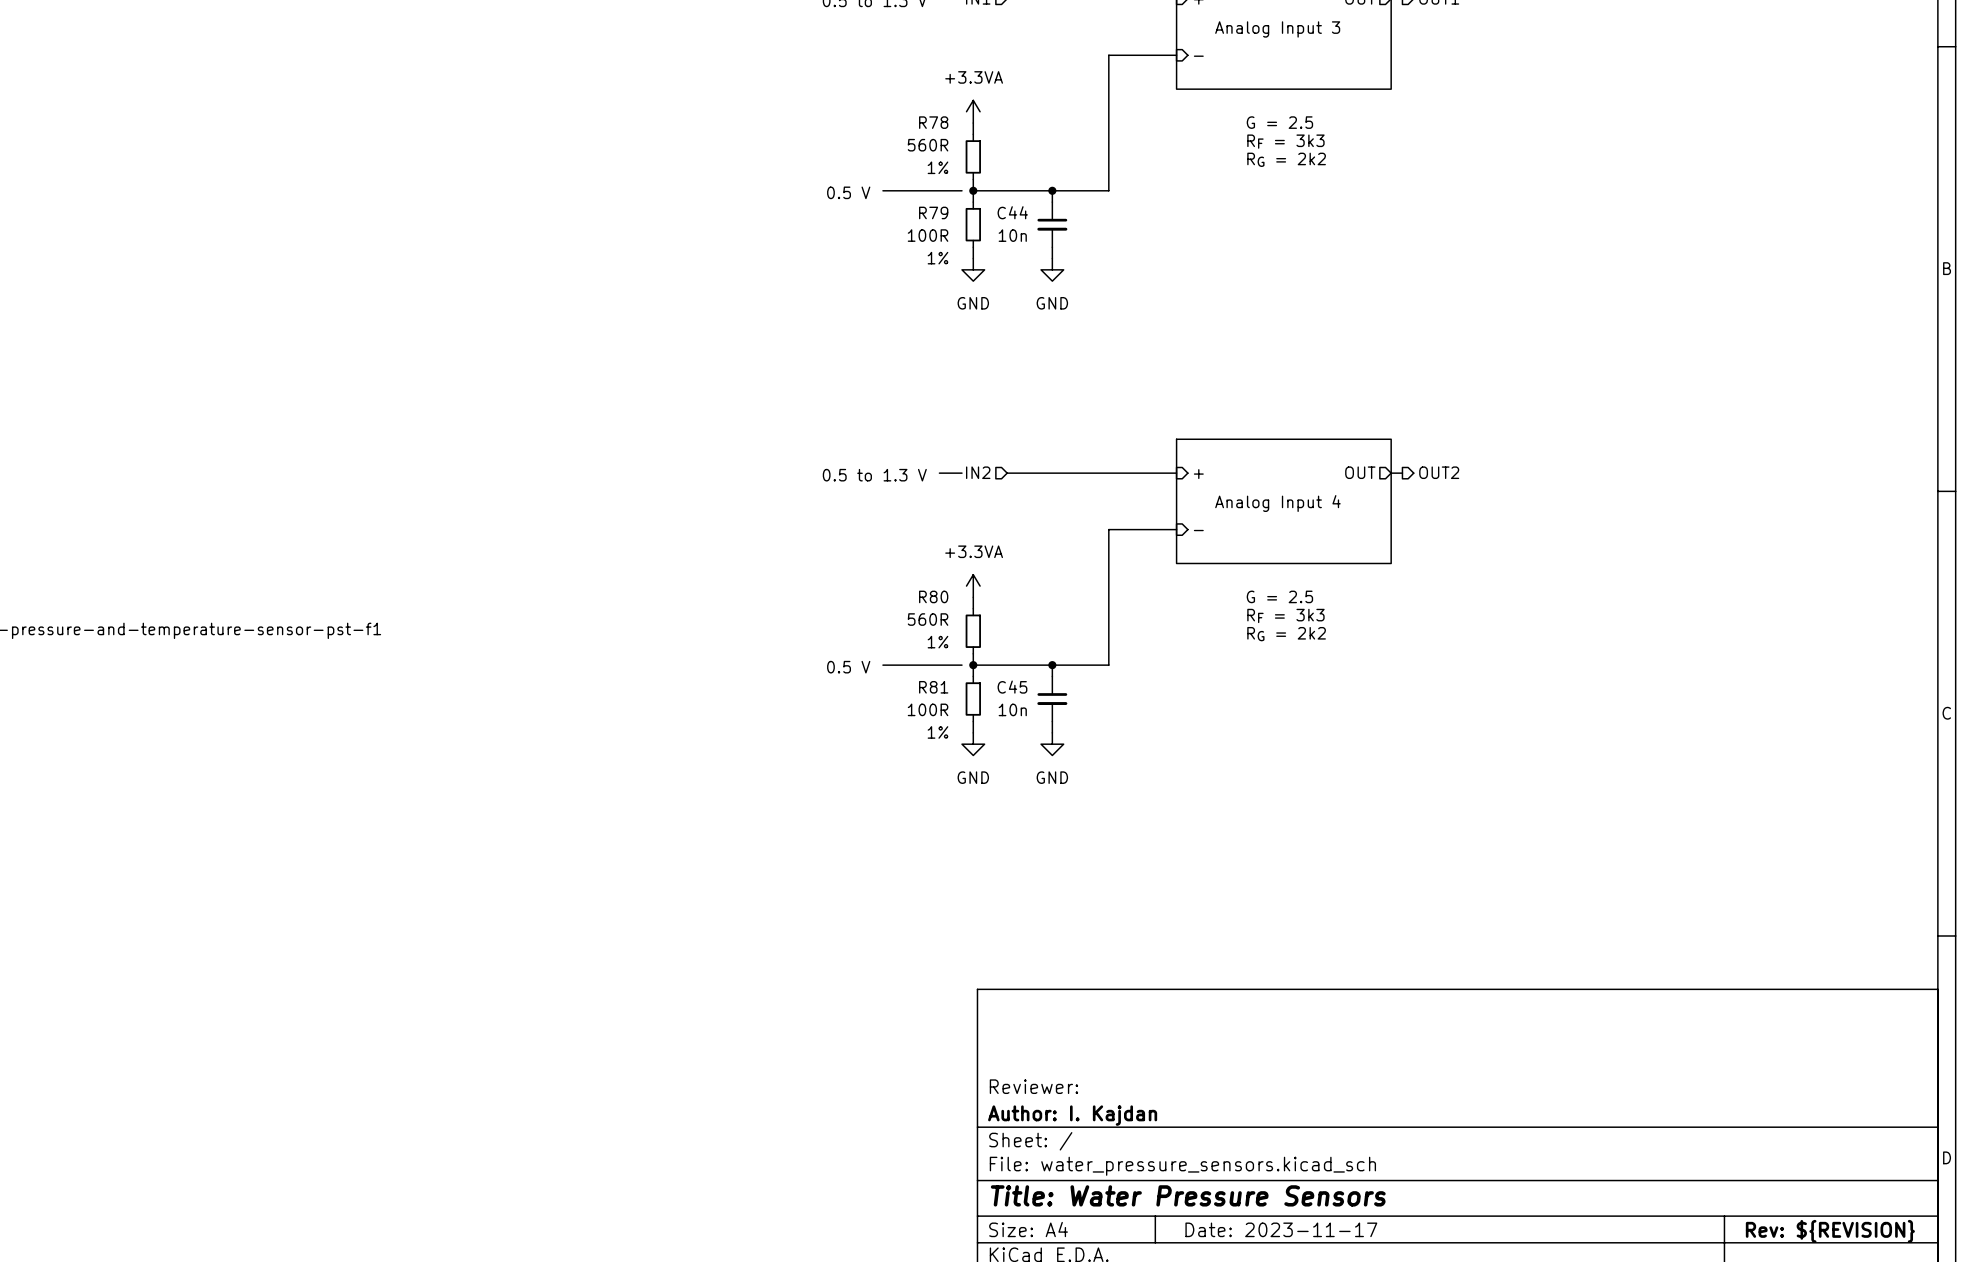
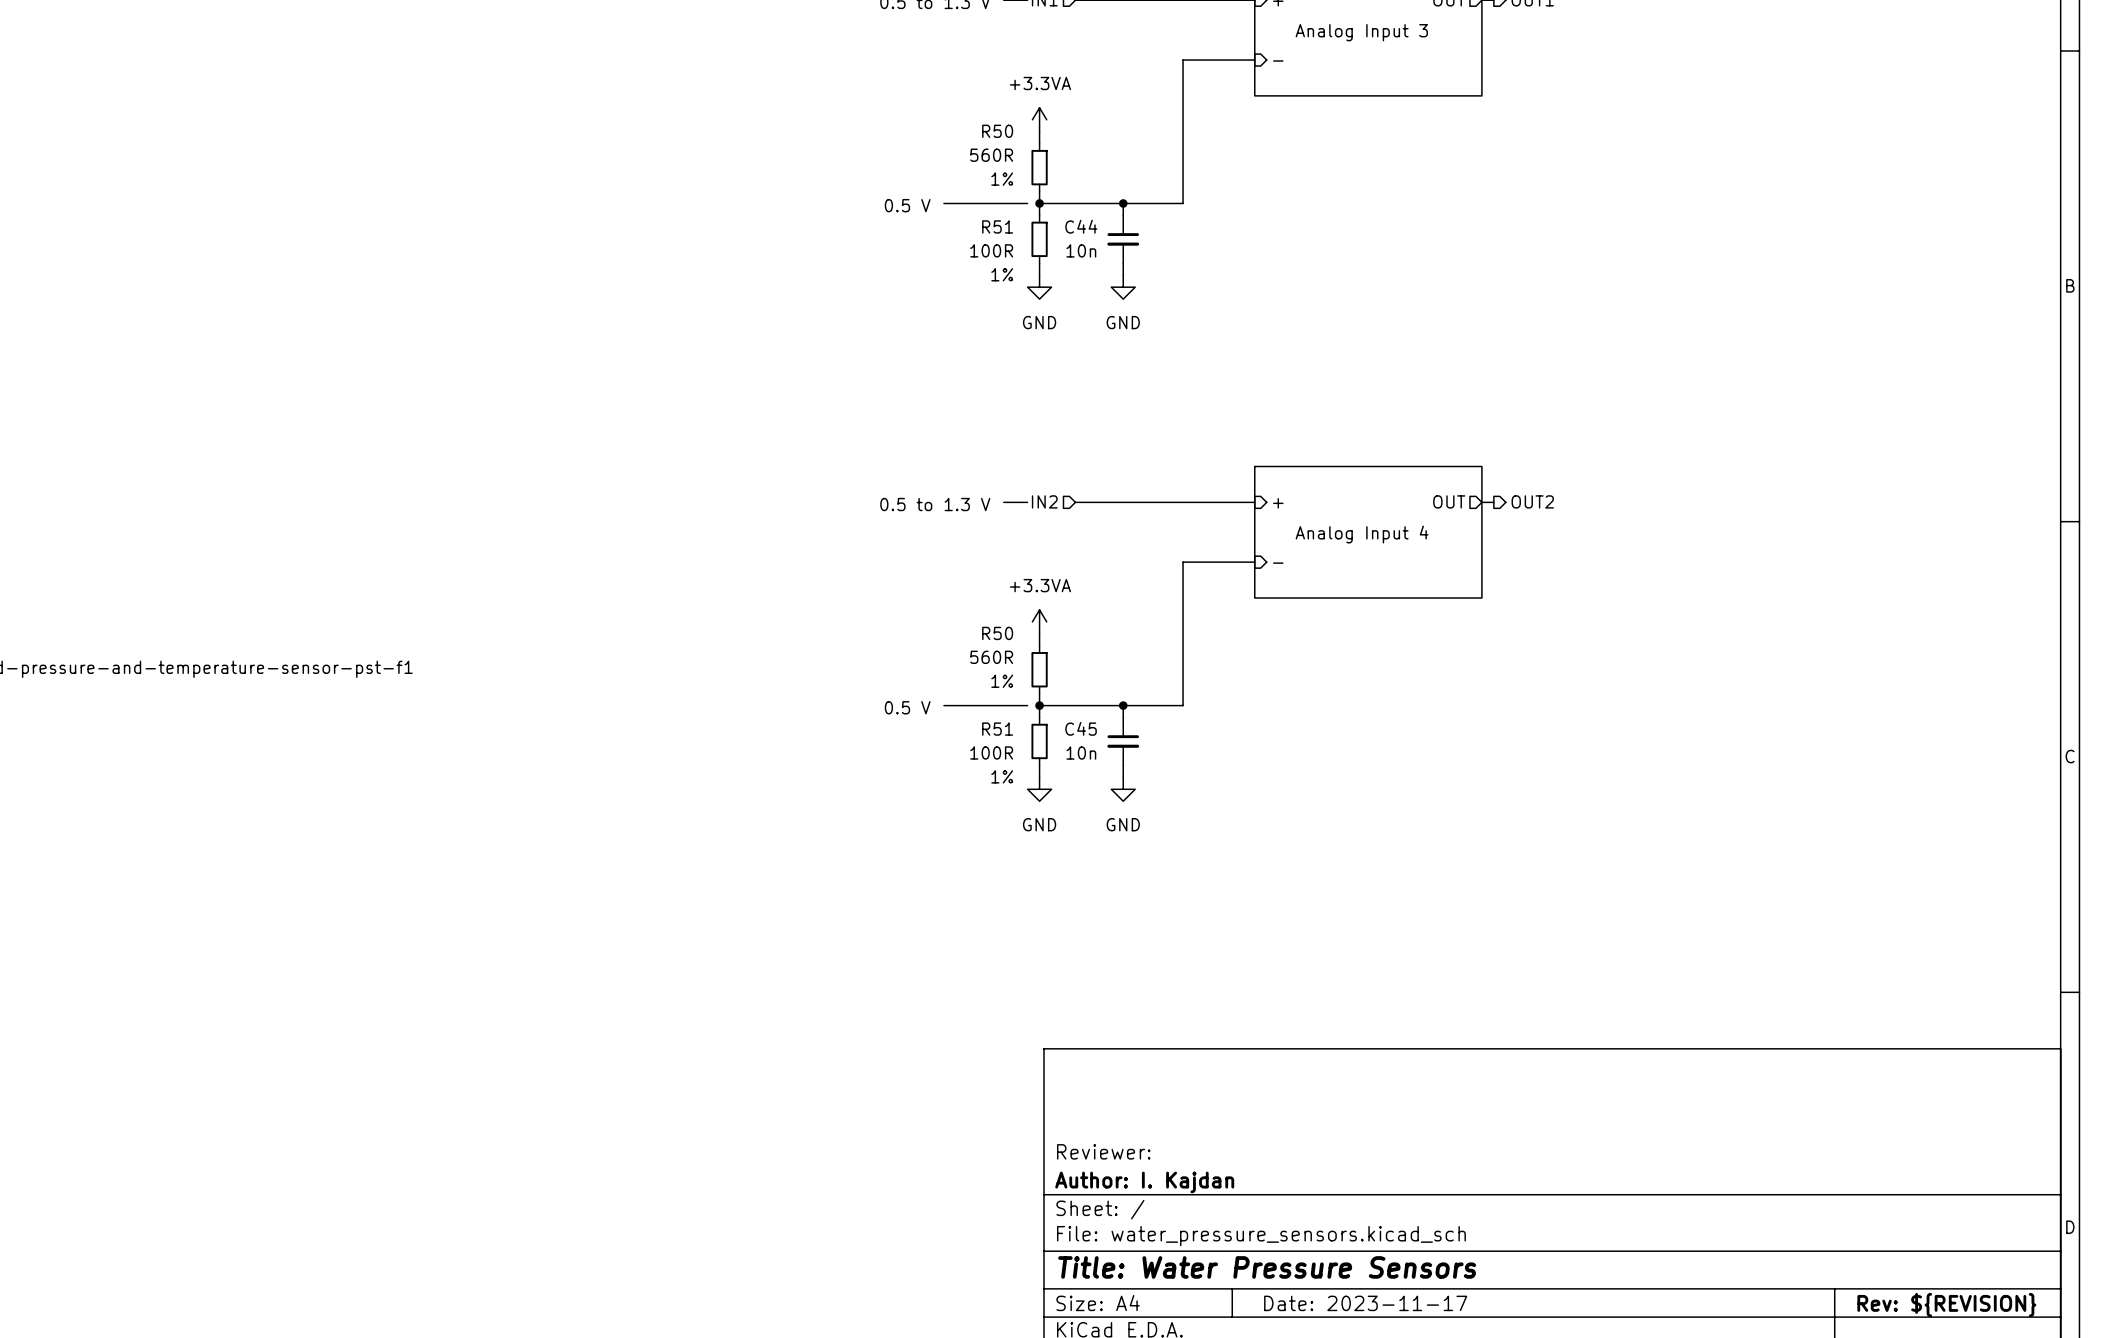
R78 name: R78 (933, 122) -> R50 (997, 131)
text: G = 2.5 (1279, 122) -> none
text: RF = 3k3 (1285, 141) -> none
text: RG = 2k2 (1286, 159) -> none
R79 name: R79 (933, 212) -> R51 (997, 226)
R80 name: R80 (933, 596) -> R50 (997, 633)
text: G = 2.5 (1279, 596) -> none
text: RF = 3k3 (1285, 615) -> none
text: RG = 2k2 (1286, 634) -> none
R81 name: R81 (933, 687) -> R51 (997, 729)

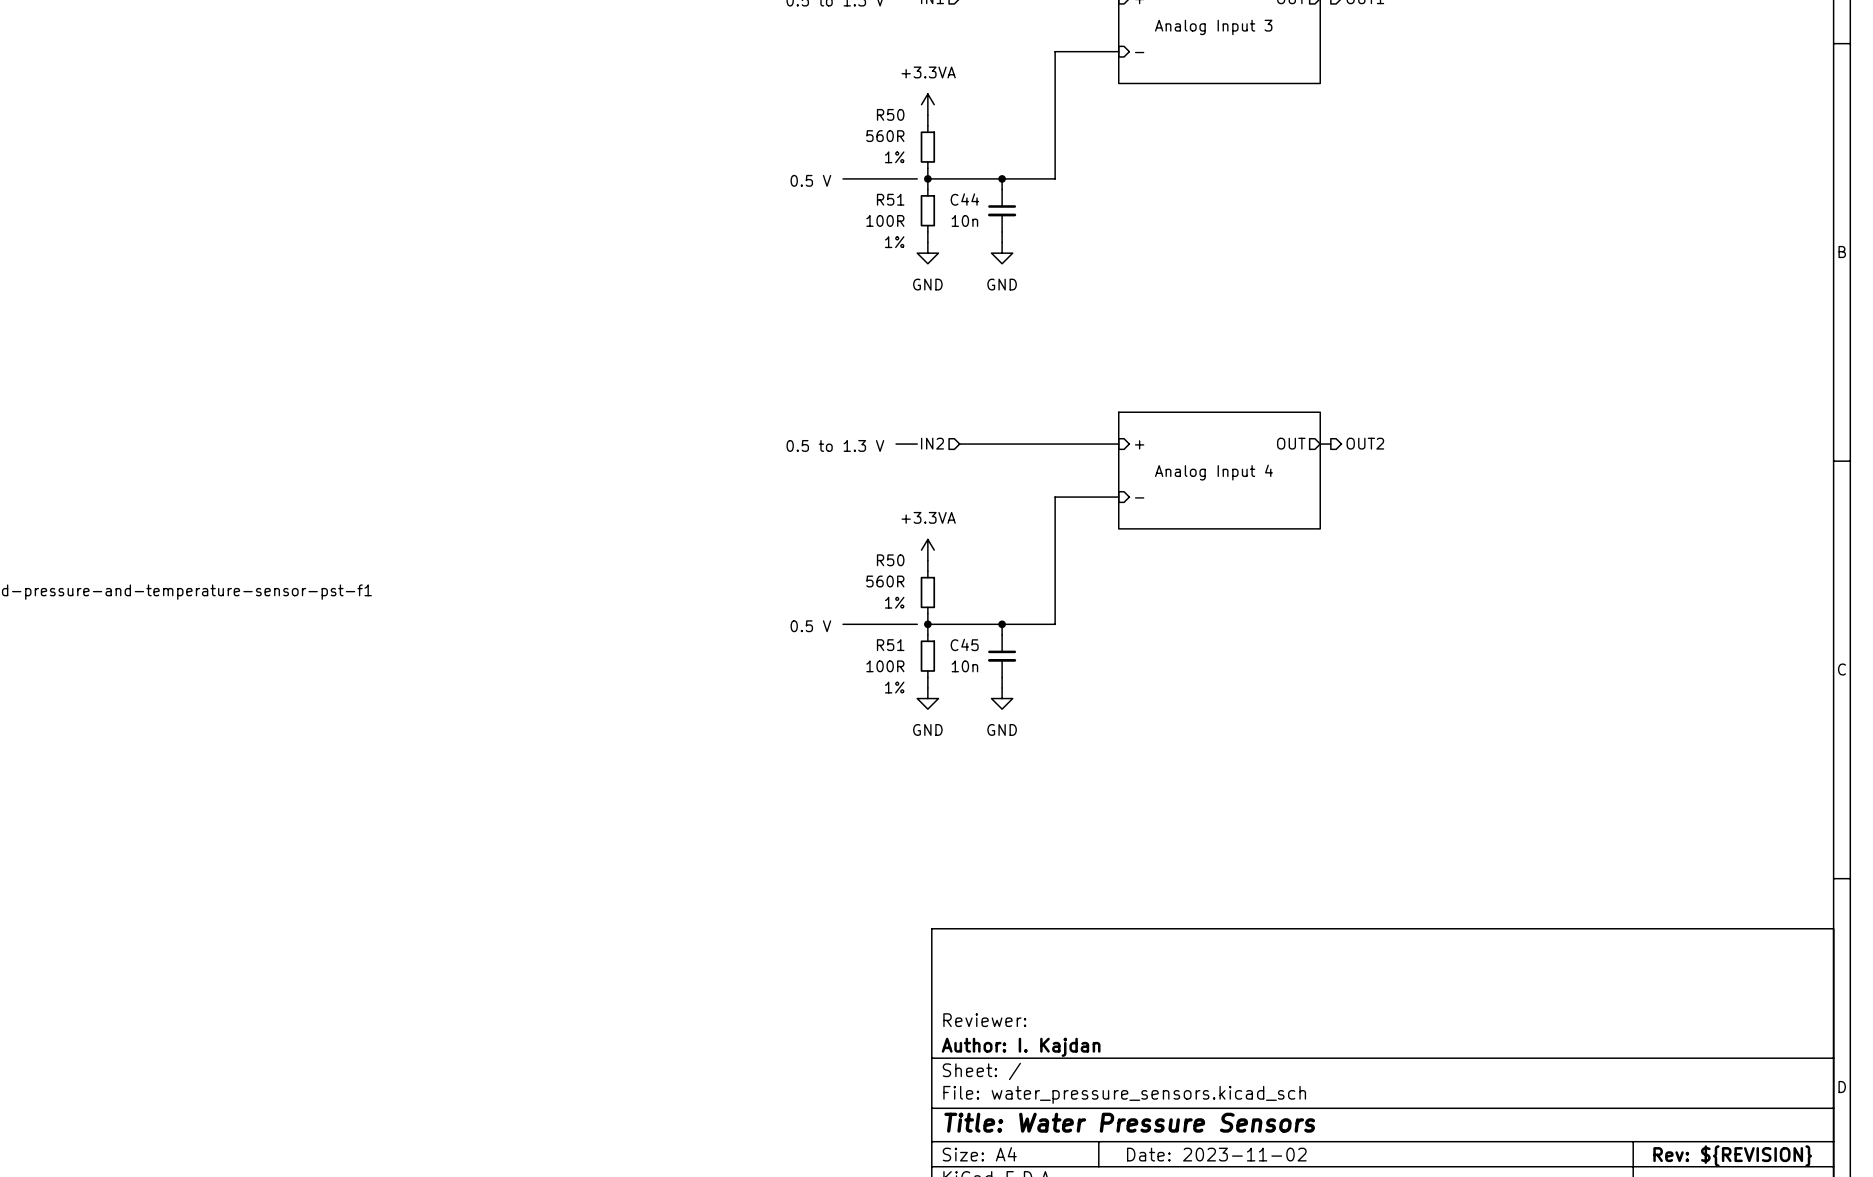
title block: Date: 2023-11-17 (1365, 1303) -> Date: 2023-11-02 (1216, 1154)

